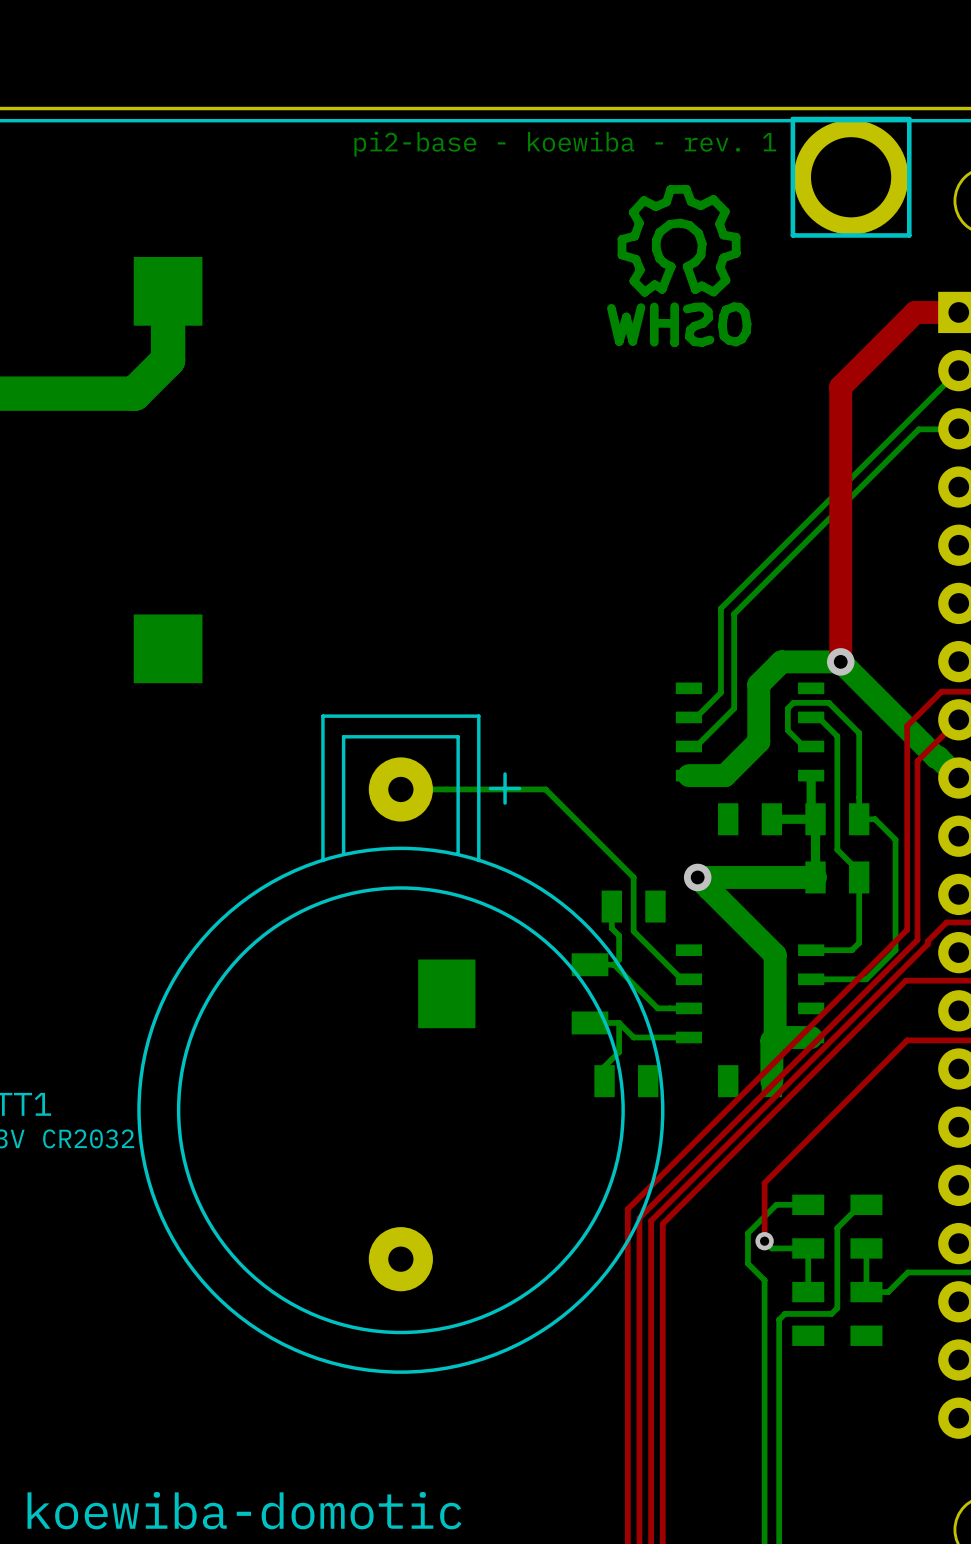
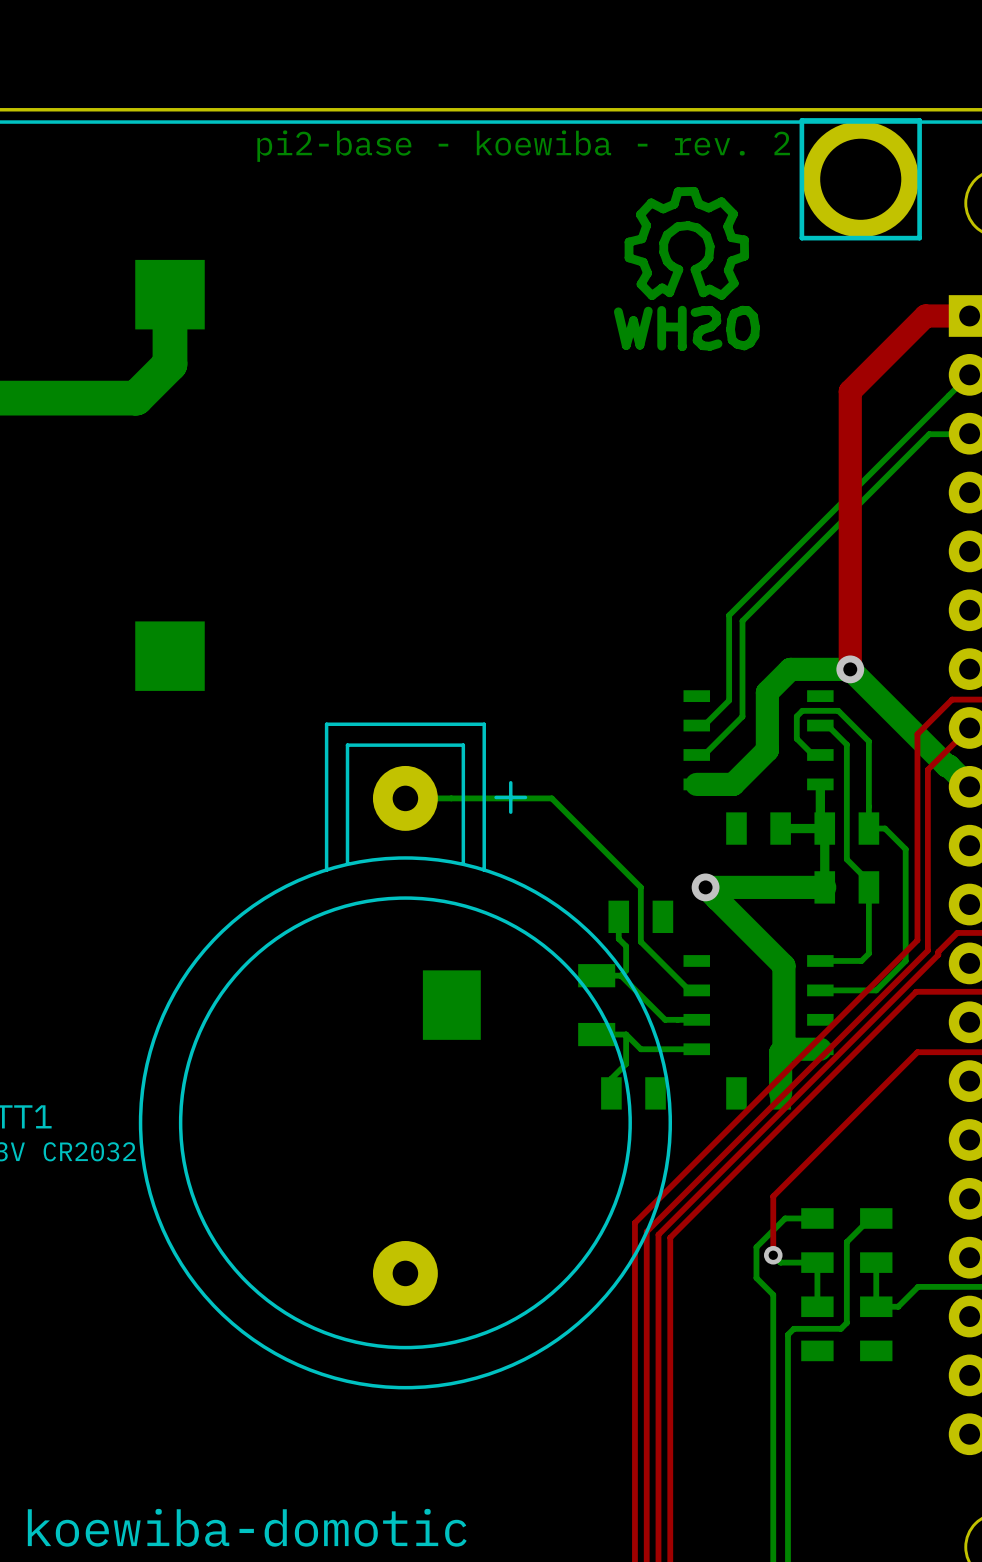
text: pi2-base - koewiba - rev. 1 (565, 144) -> pi2-base - koewiba - rev. 2 (523, 146)

